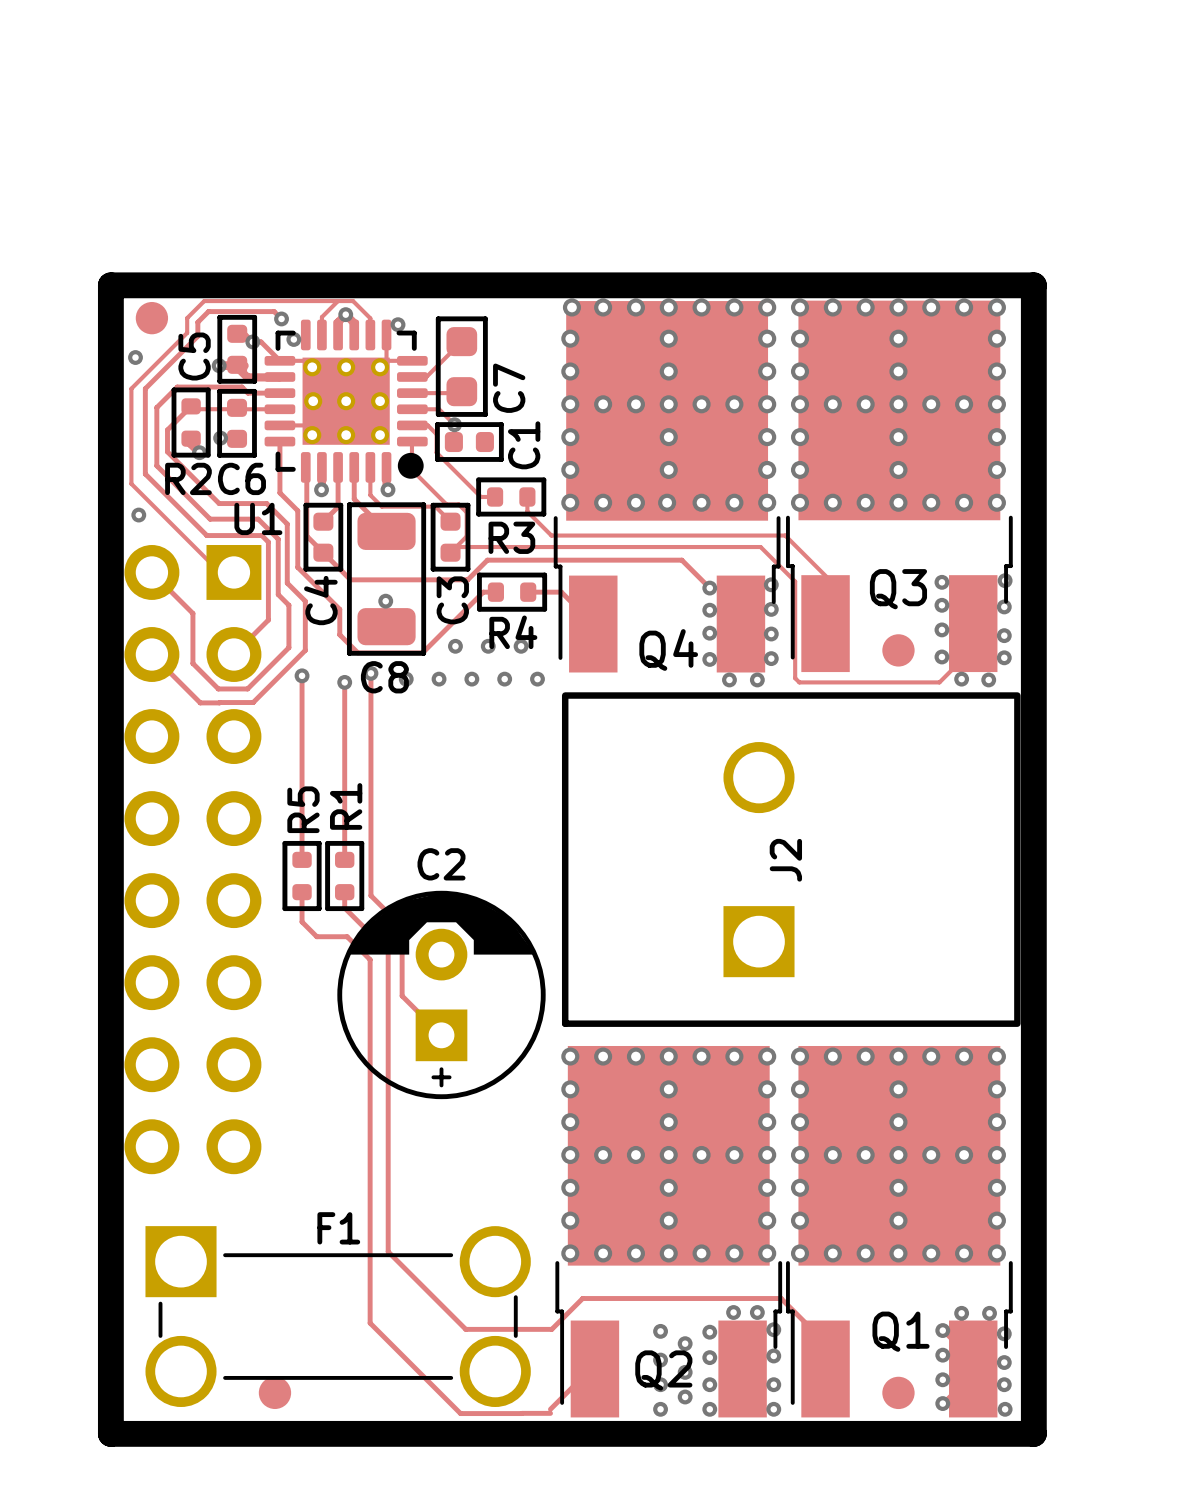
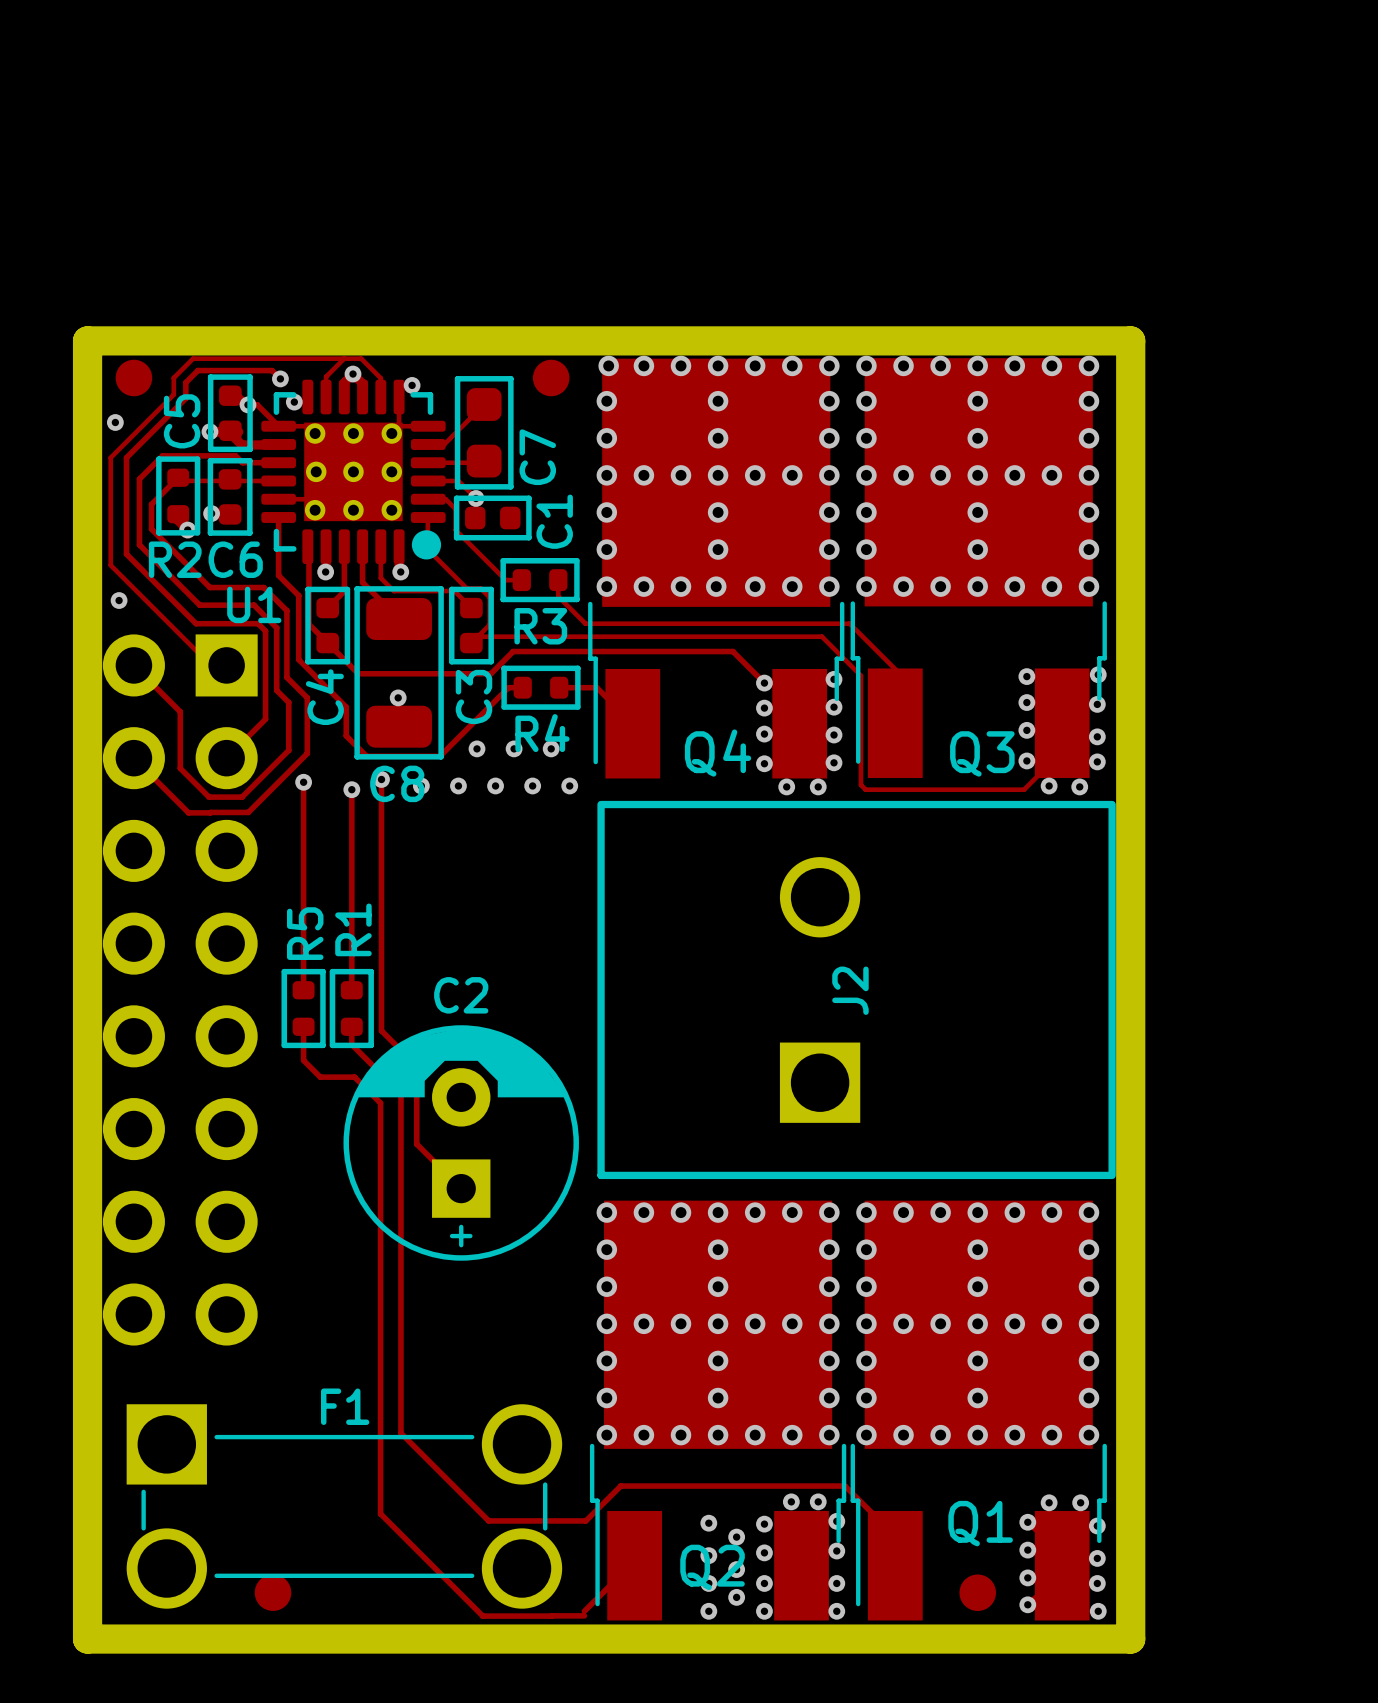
Q3 name position: Q3 (898, 589) -> Q3 (982, 753)
part position: (898, 650) -> (551, 377)

